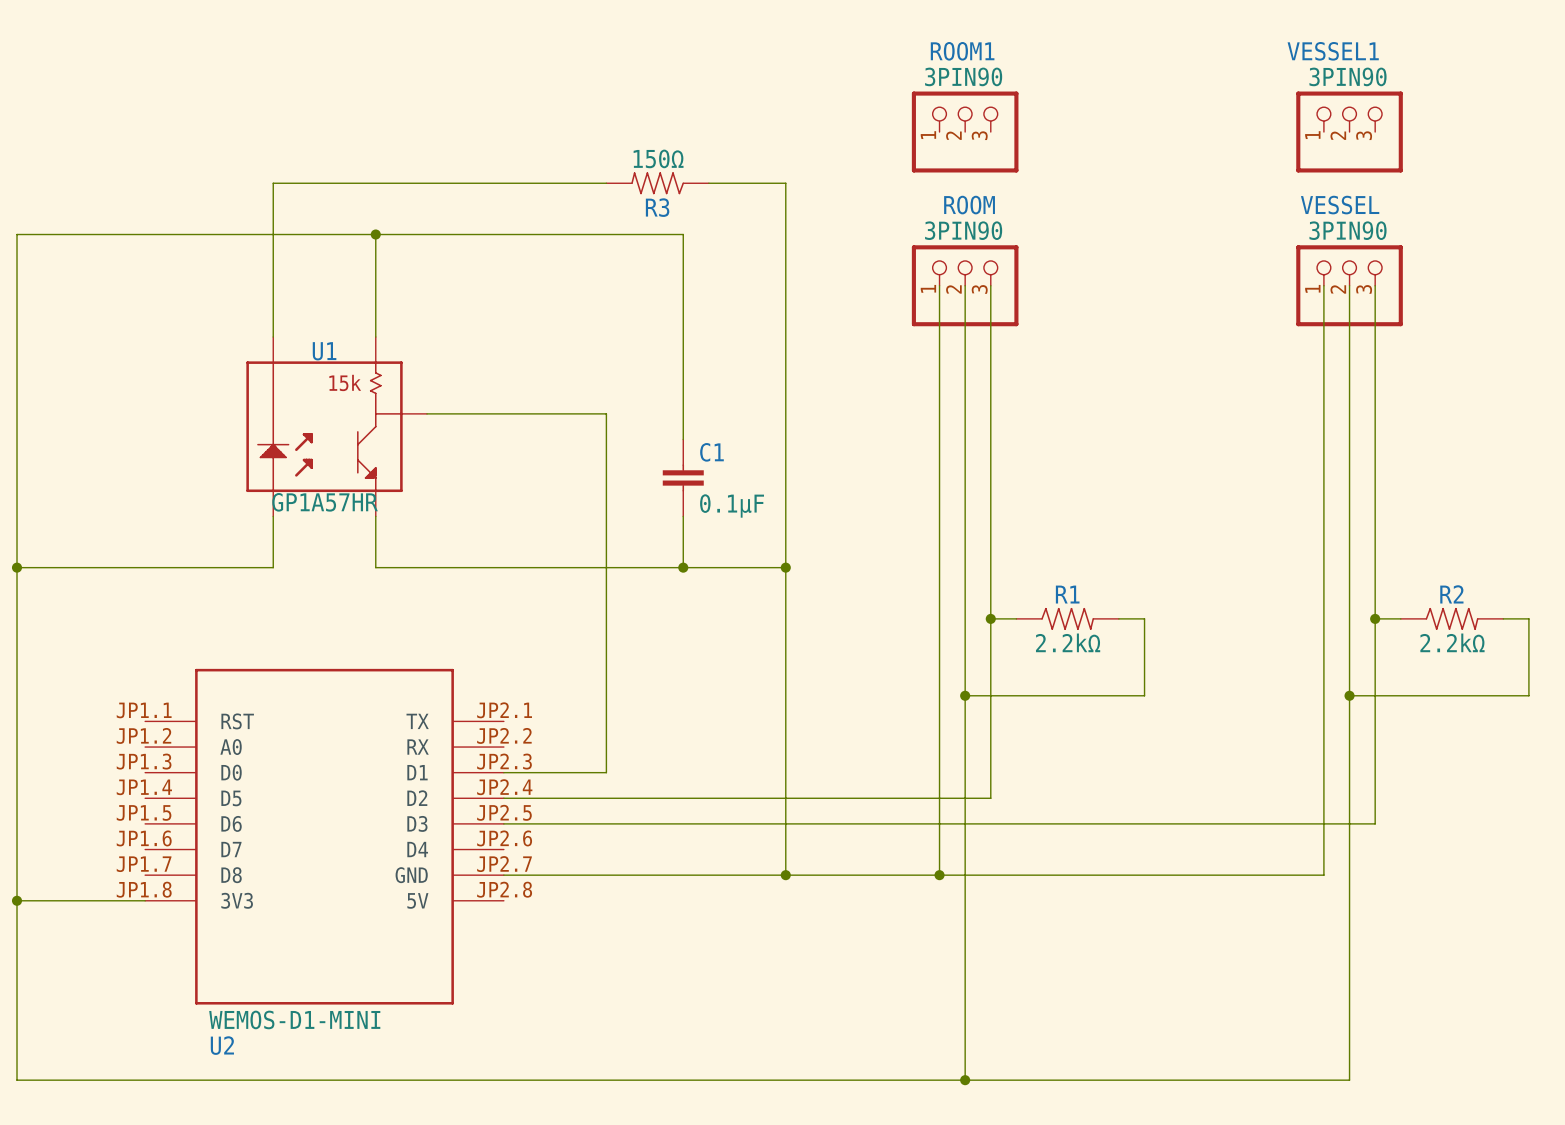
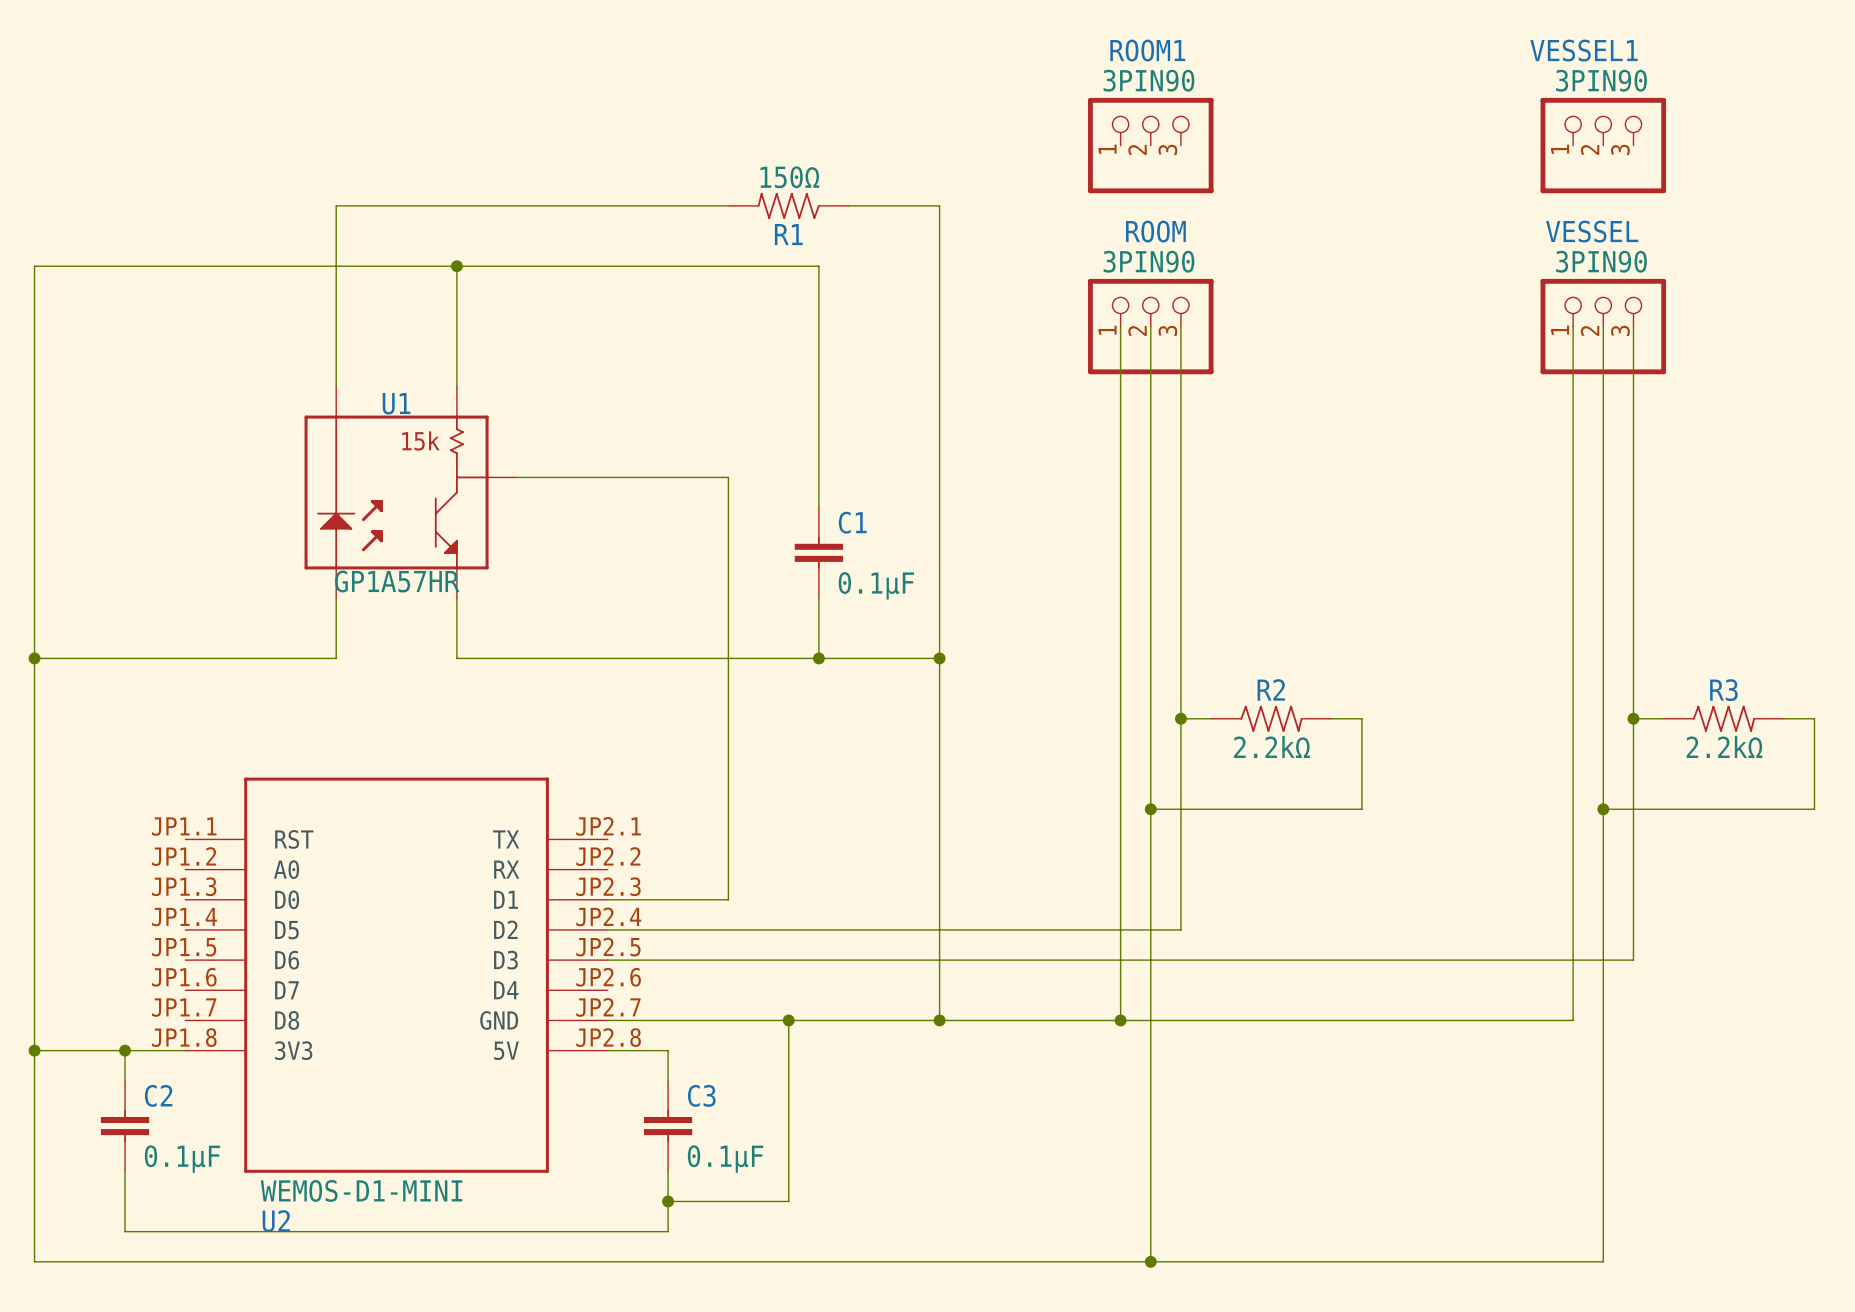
R3 name: R3 (657, 207) -> R1 (788, 234)
R1 name: R1 (1067, 594) -> R2 (1271, 689)
R2 name: R2 (1451, 594) -> R3 (1723, 690)
wire: none -> (788, 1020) (788, 1201) (668, 1201)
junction: none -> (788, 1020)
wire: none -> (125, 1050) (125, 1080)
junction: none -> (125, 1050)
wire: none -> (607, 1050) (668, 1050) (668, 1080)
C2: none -> 0.1μF (125, 1126)
C3: none -> 0.1μF (668, 1126)
wire: none -> (125, 1171) (125, 1231) (668, 1231) (668, 1171)
junction: none -> (668, 1201)

